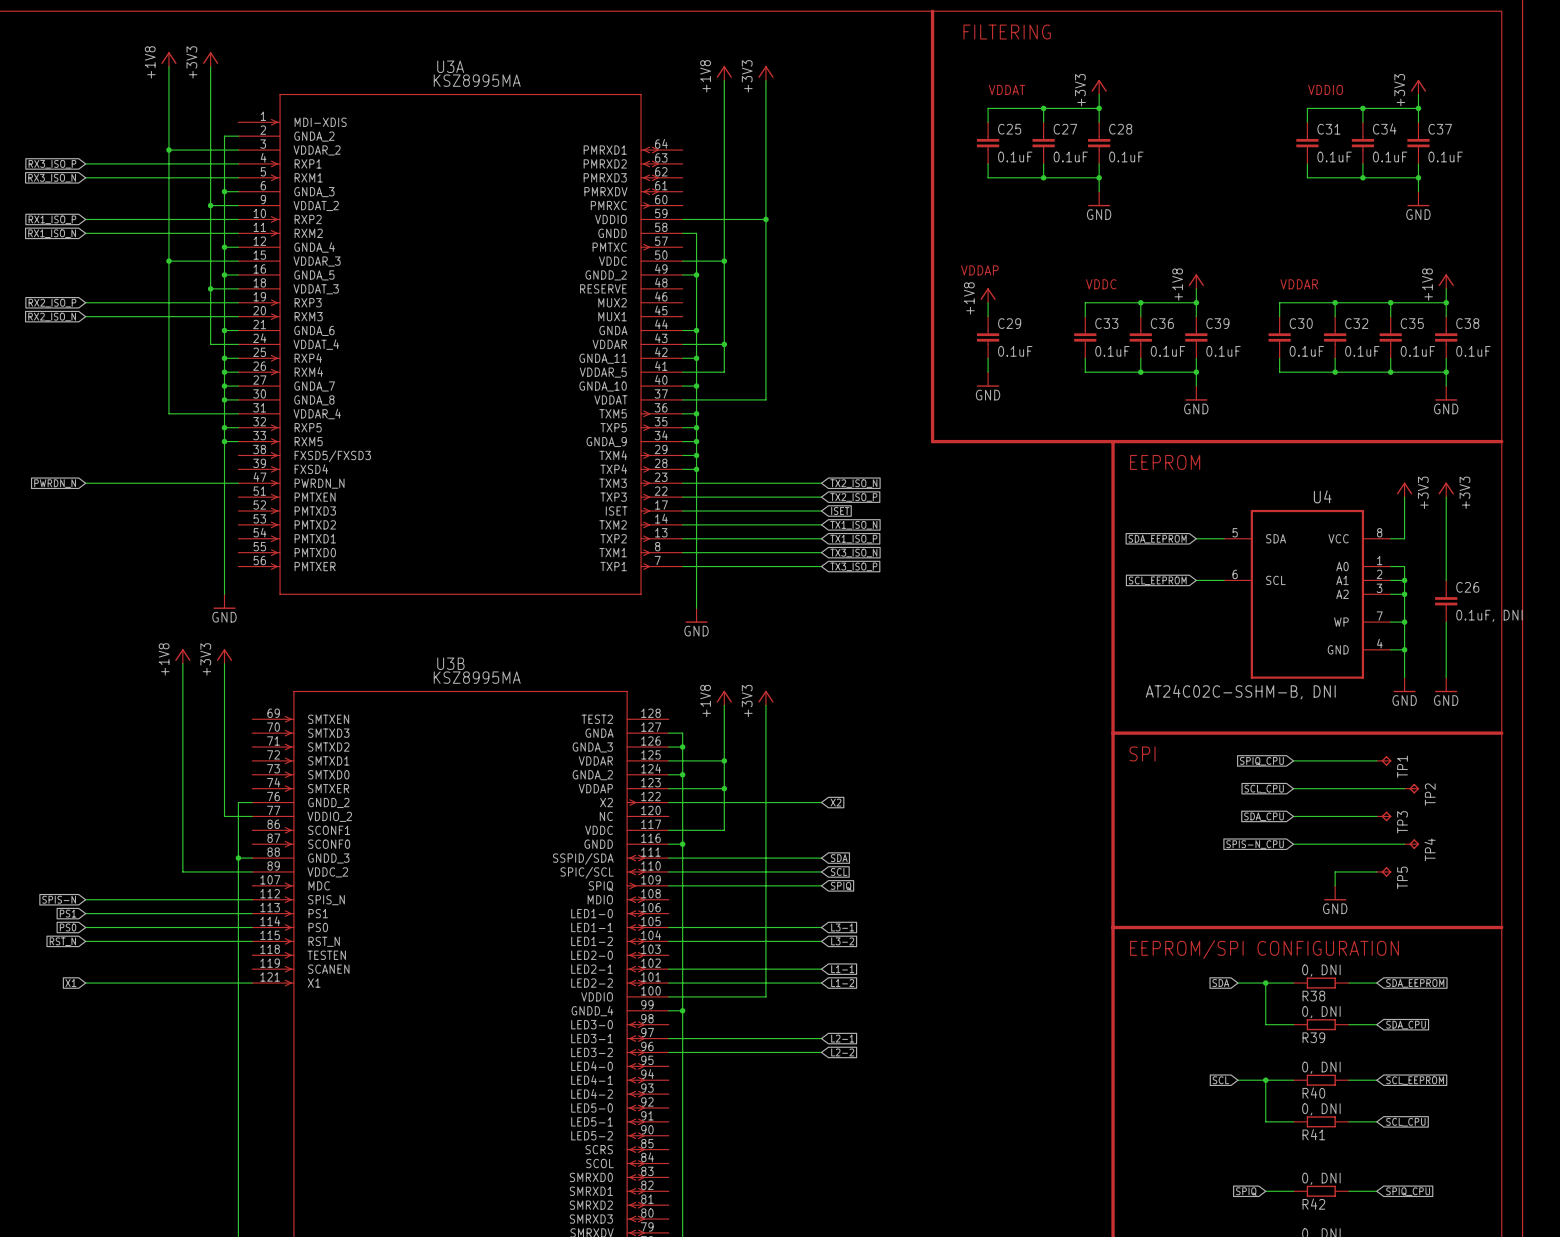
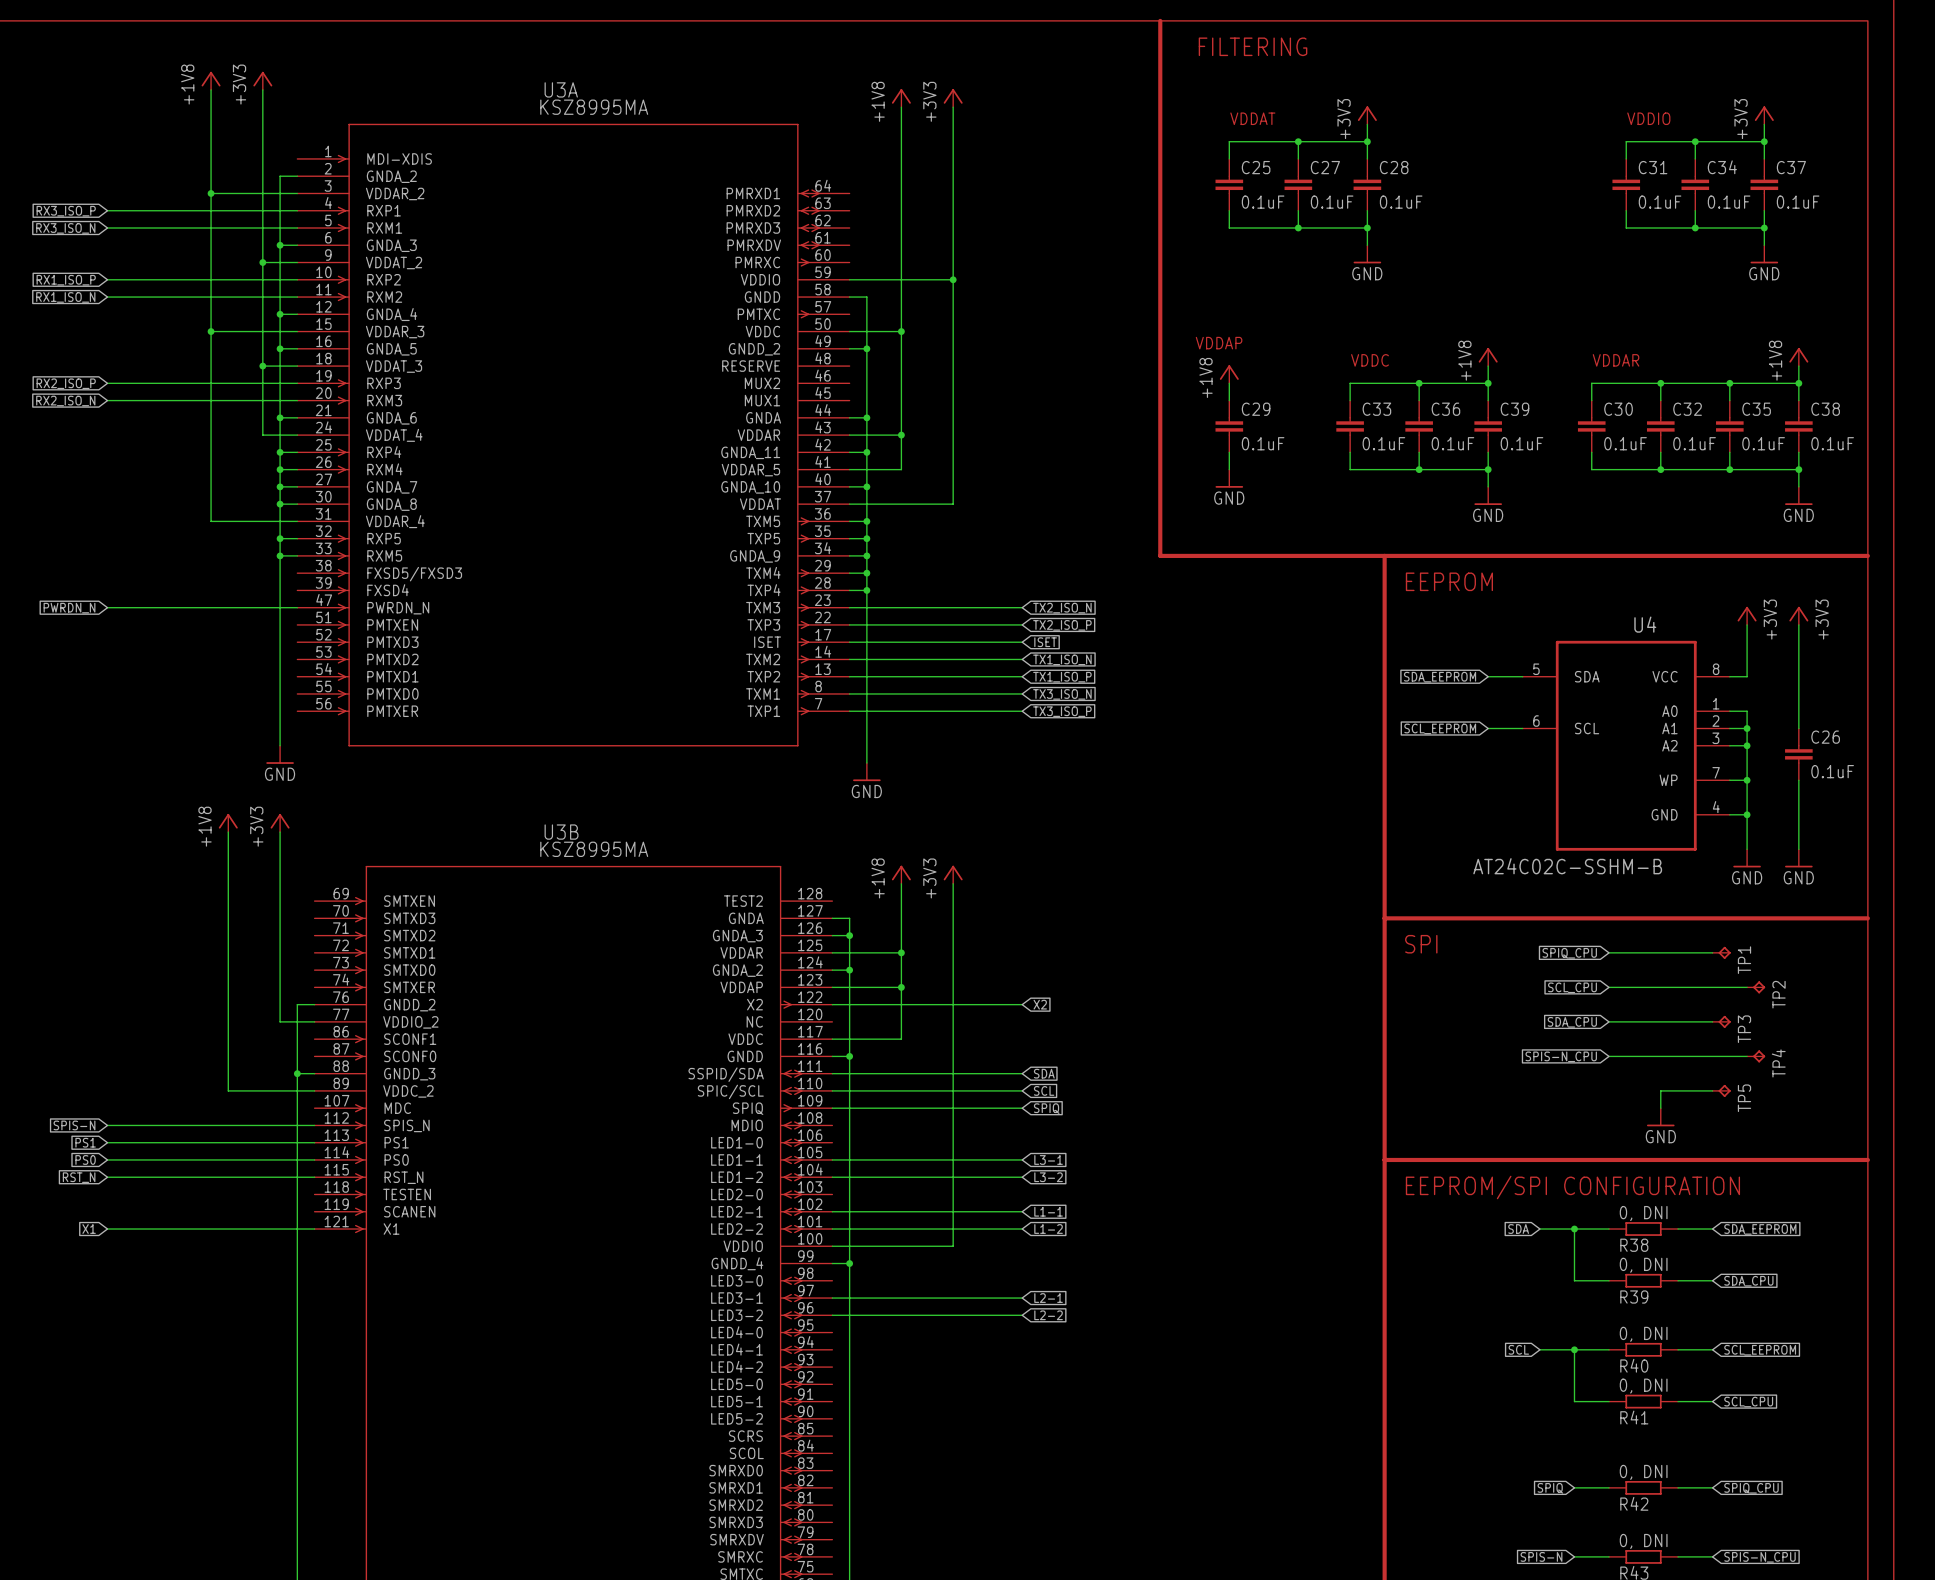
C26 value: 0.1uF, DNI (1489, 615) -> 0.1uF (1832, 771)
U4 value: AT24C02C-SSHM-B, DNI (1240, 692) -> AT24C02C-SSHM-B (1567, 866)

